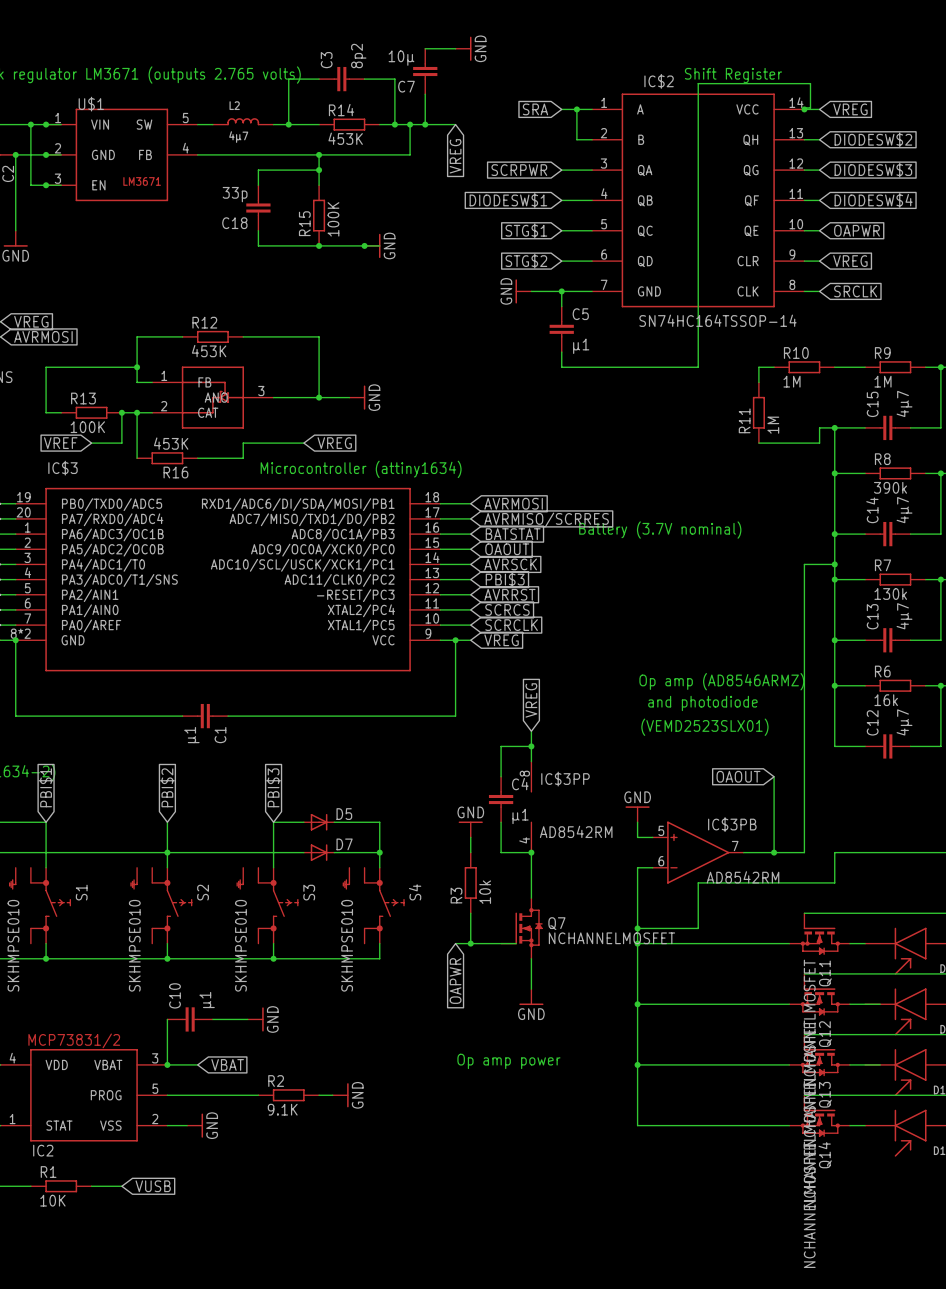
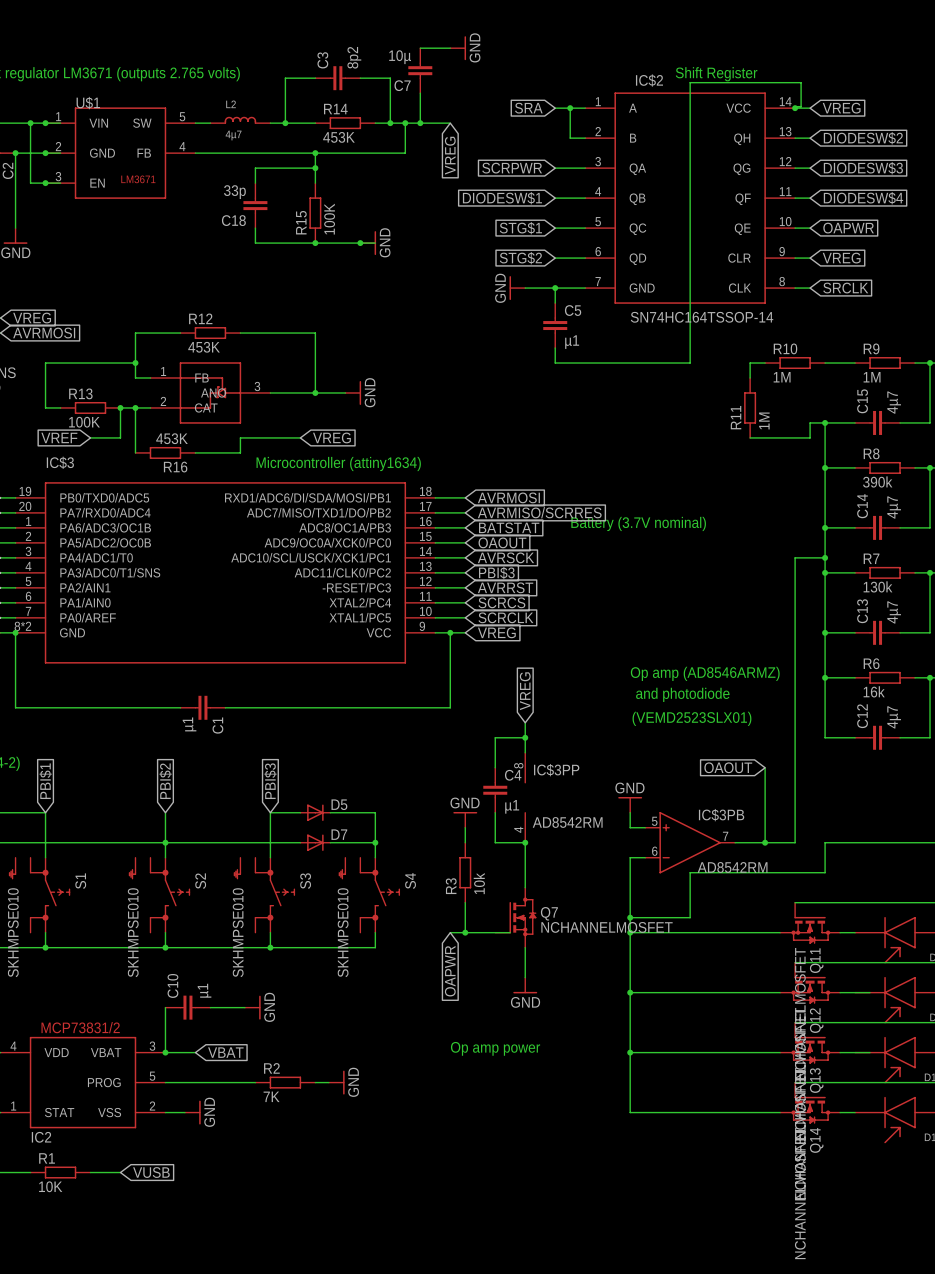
R2 value: 9.1K (282, 1109) -> 7K (271, 1096)

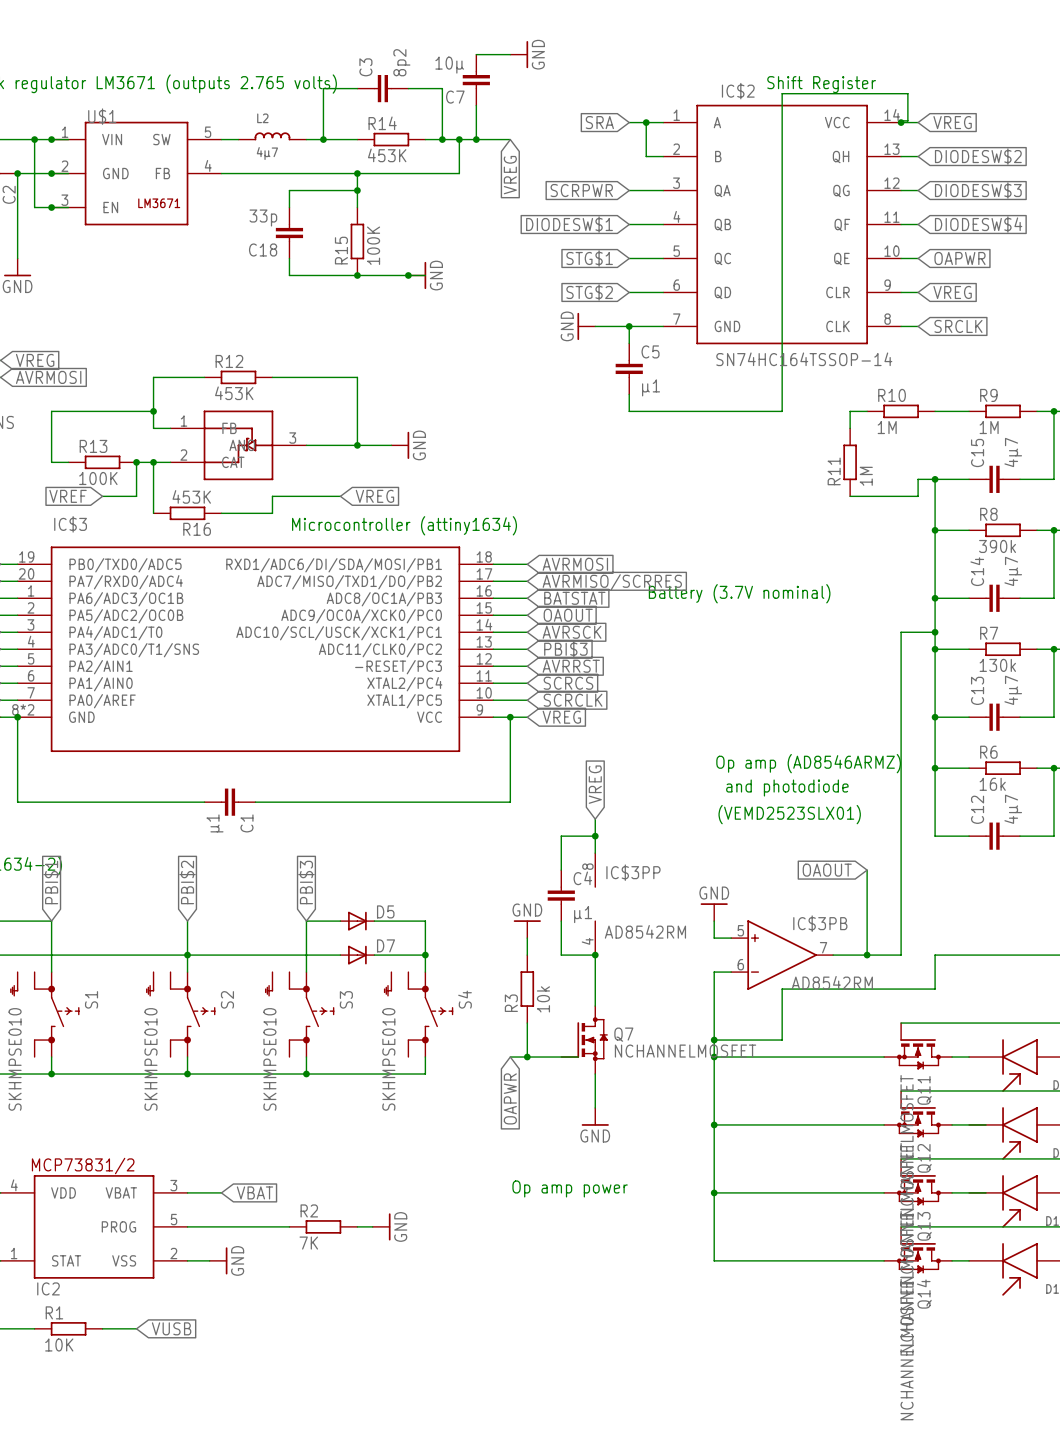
wire: (165, 1007) (165, 1052) -> none
C10: µ1 (187, 1007) -> none
wire: (210, 1007) (244, 1007) -> none
power symbol: GND (252, 1007) -> none
junction: (165, 1052) -> none

